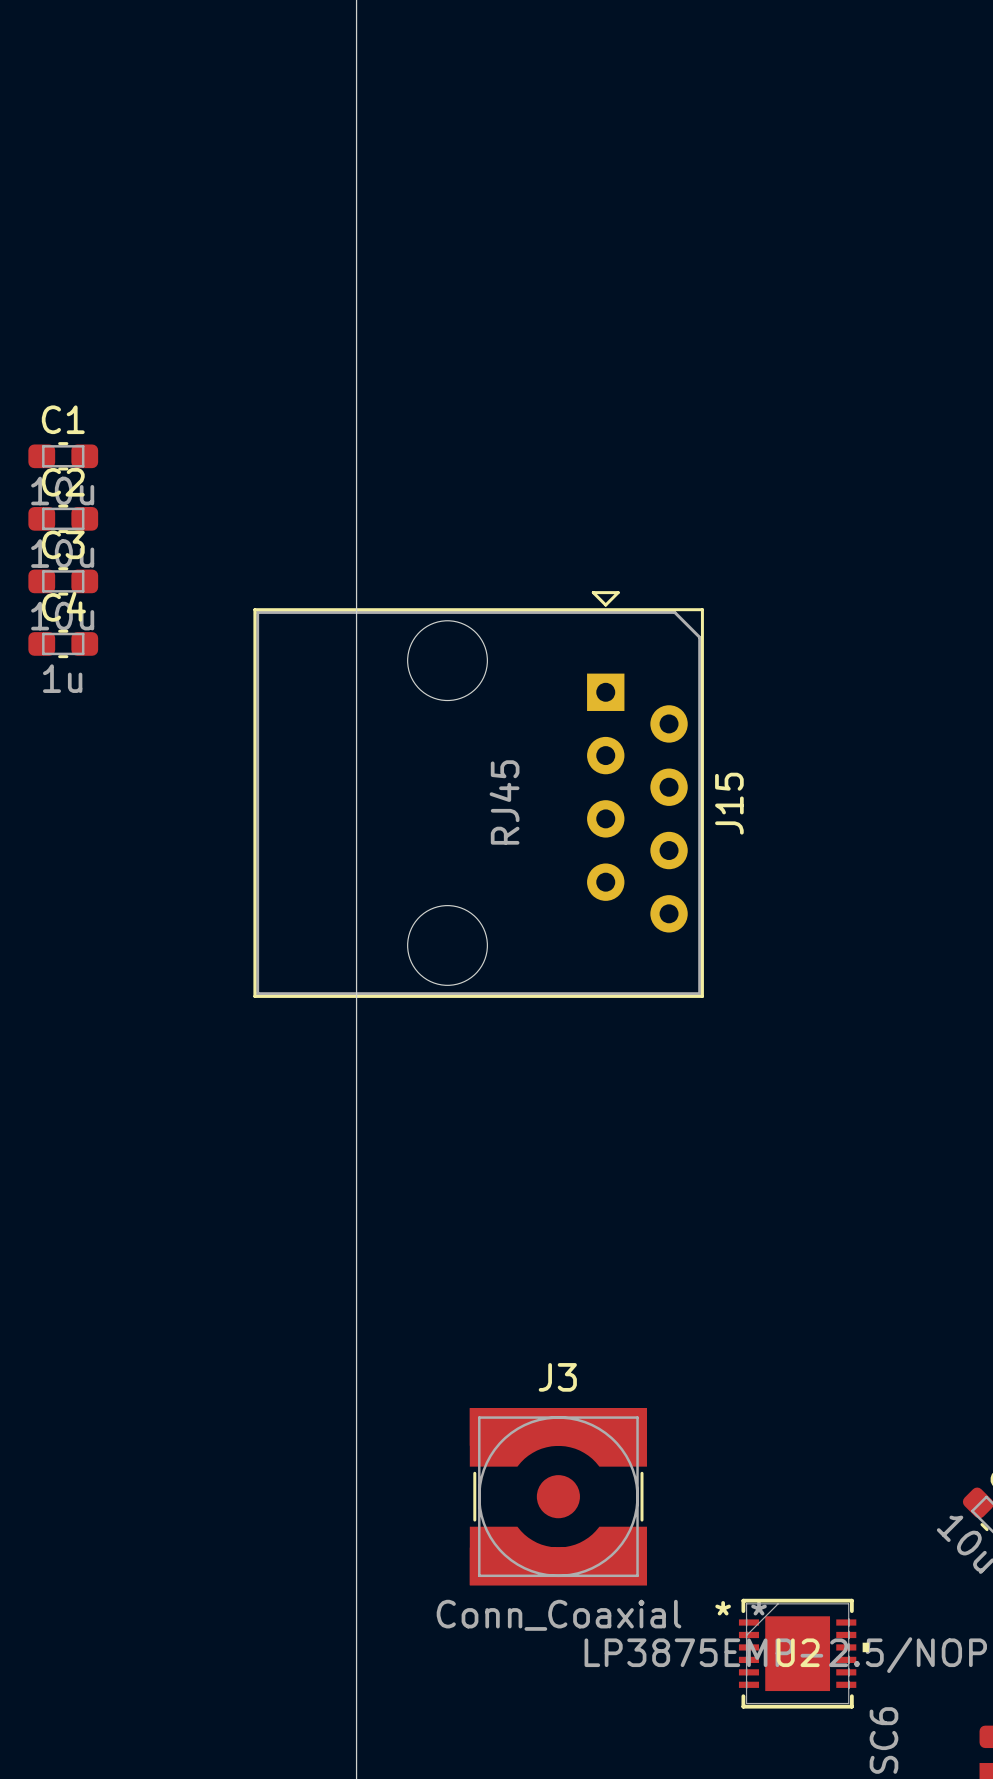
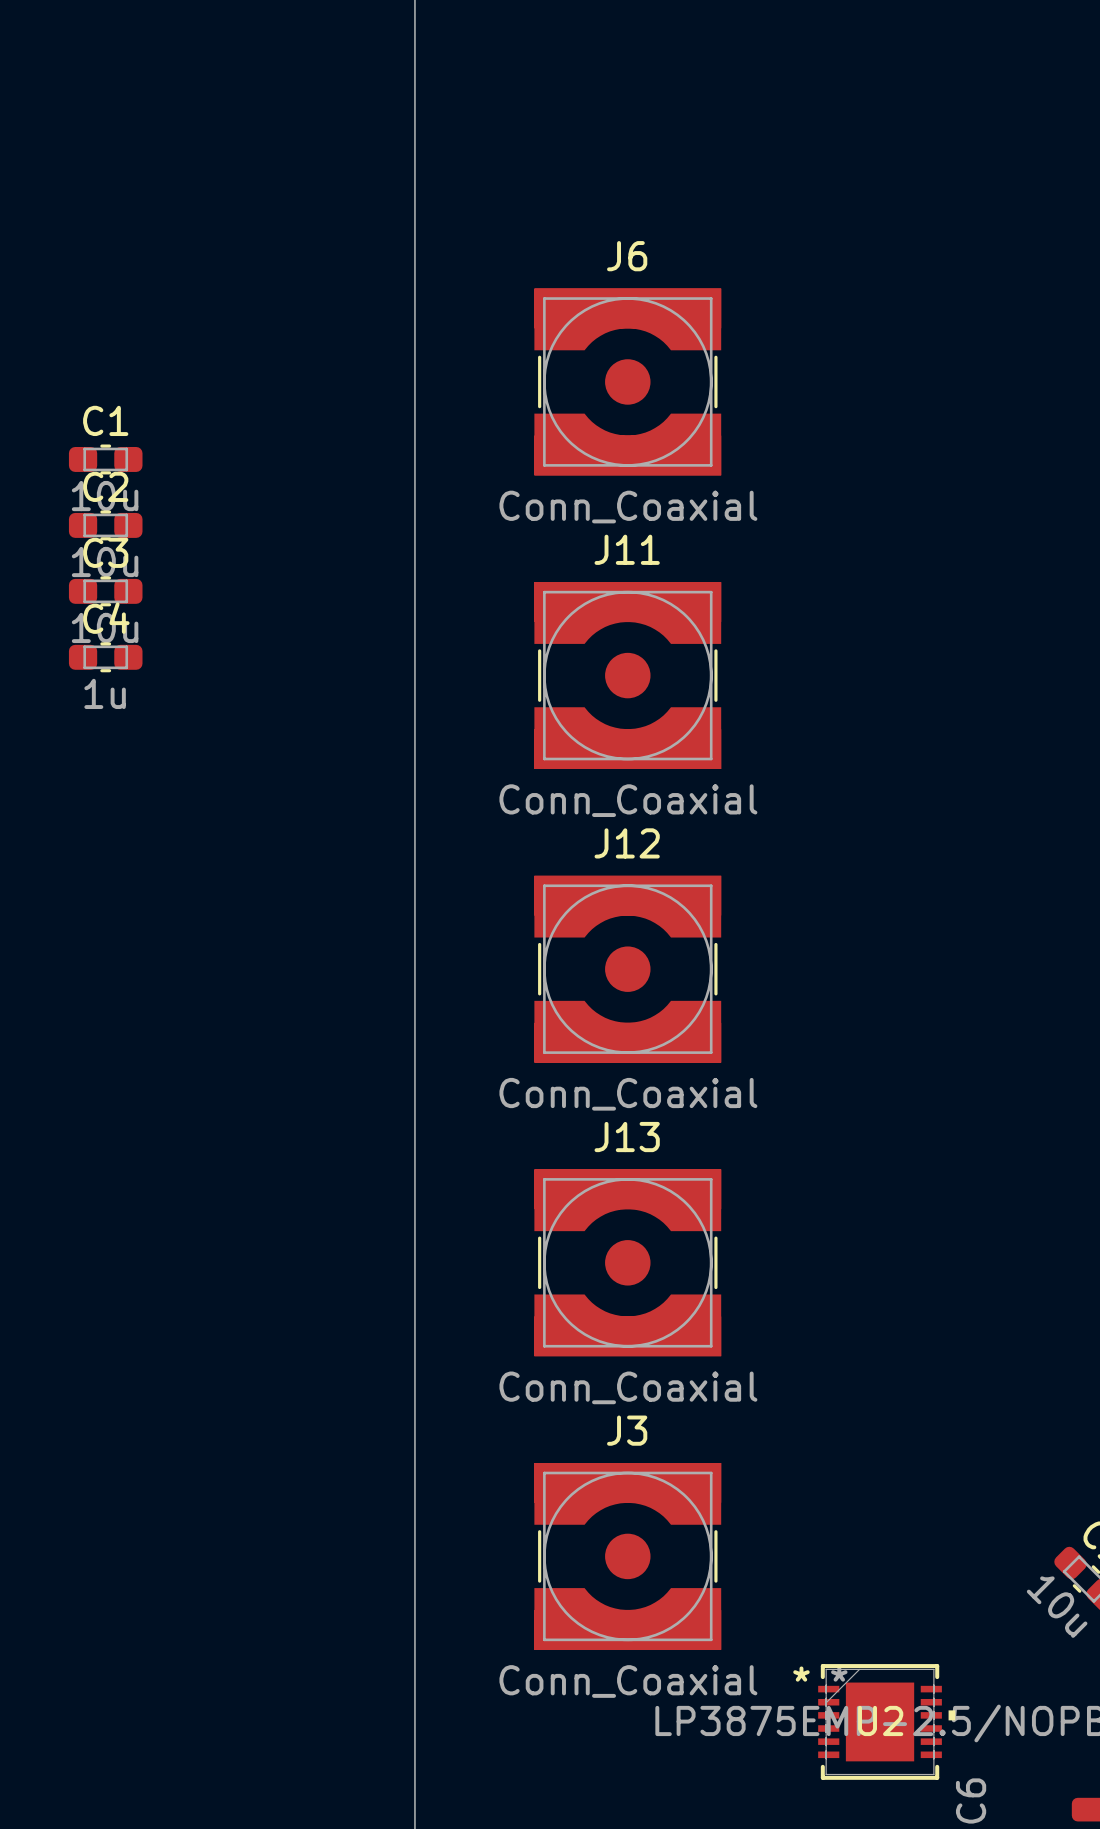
J6: none -> Conn_Coaxial (627, 381)
J11: none -> Conn_Coaxial (627, 675)
J15: RJ45 (478, 794) -> none
J12: none -> Conn_Coaxial (627, 969)
J13: none -> Conn_Coaxial (627, 1262)

